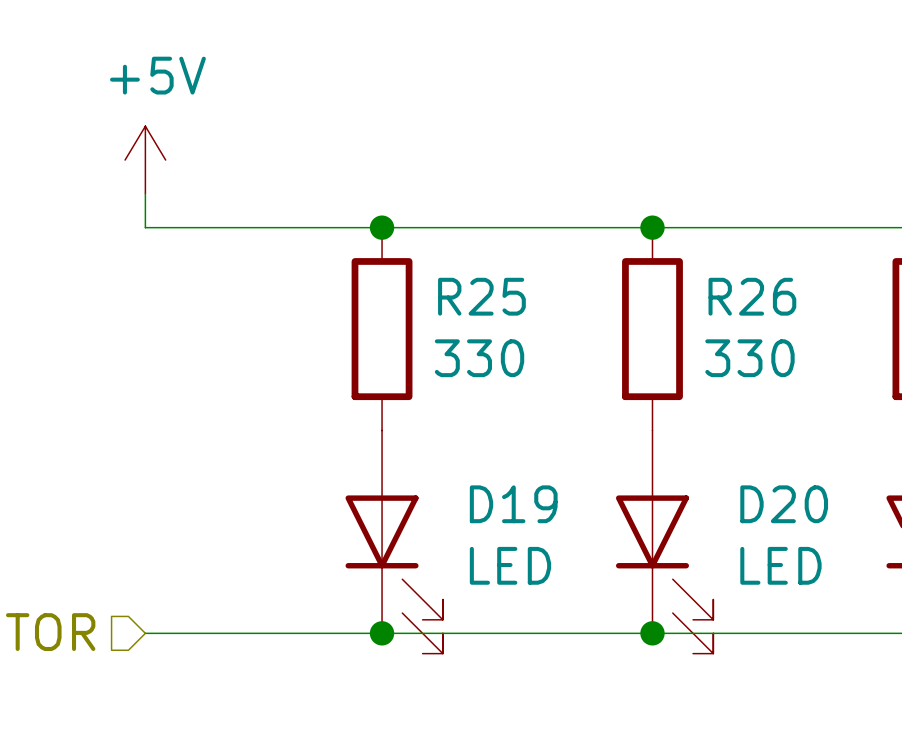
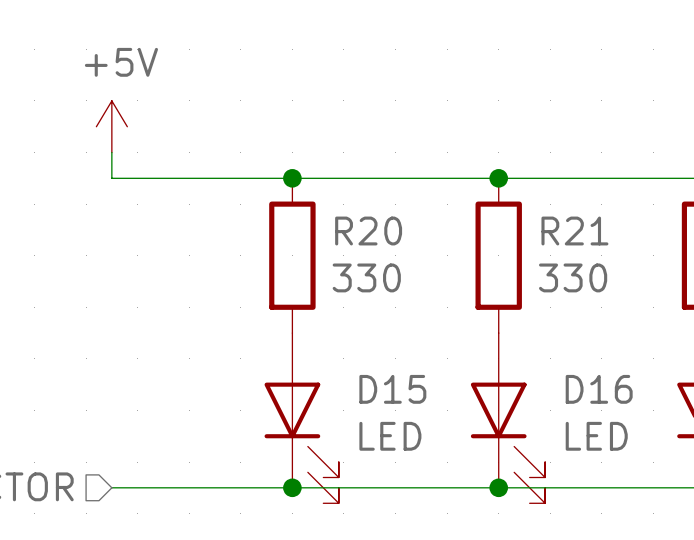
R25 name: R25 (481, 296) -> R20 (368, 231)
R26 name: R26 (752, 296) -> R21 (574, 231)
D19 name: D19 (513, 504) -> D15 (392, 389)
D20 name: D20 (784, 504) -> D16 (599, 389)

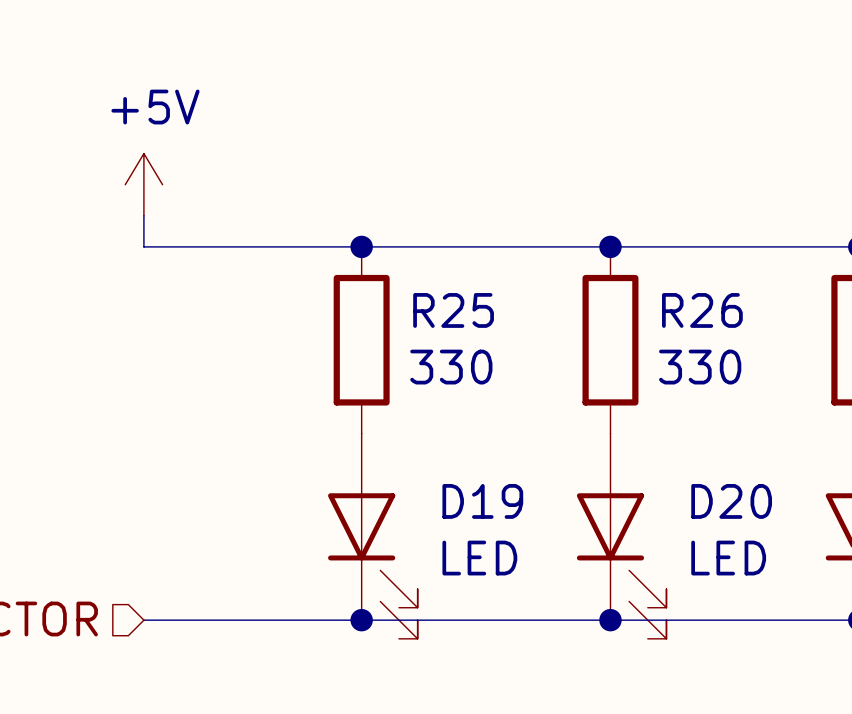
R20 name: R20 (368, 231) -> R25 (453, 310)
R21 name: R21 (574, 231) -> R26 (702, 310)
D15 name: D15 (392, 389) -> D19 (482, 501)
D16 name: D16 (599, 389) -> D20 (731, 501)

